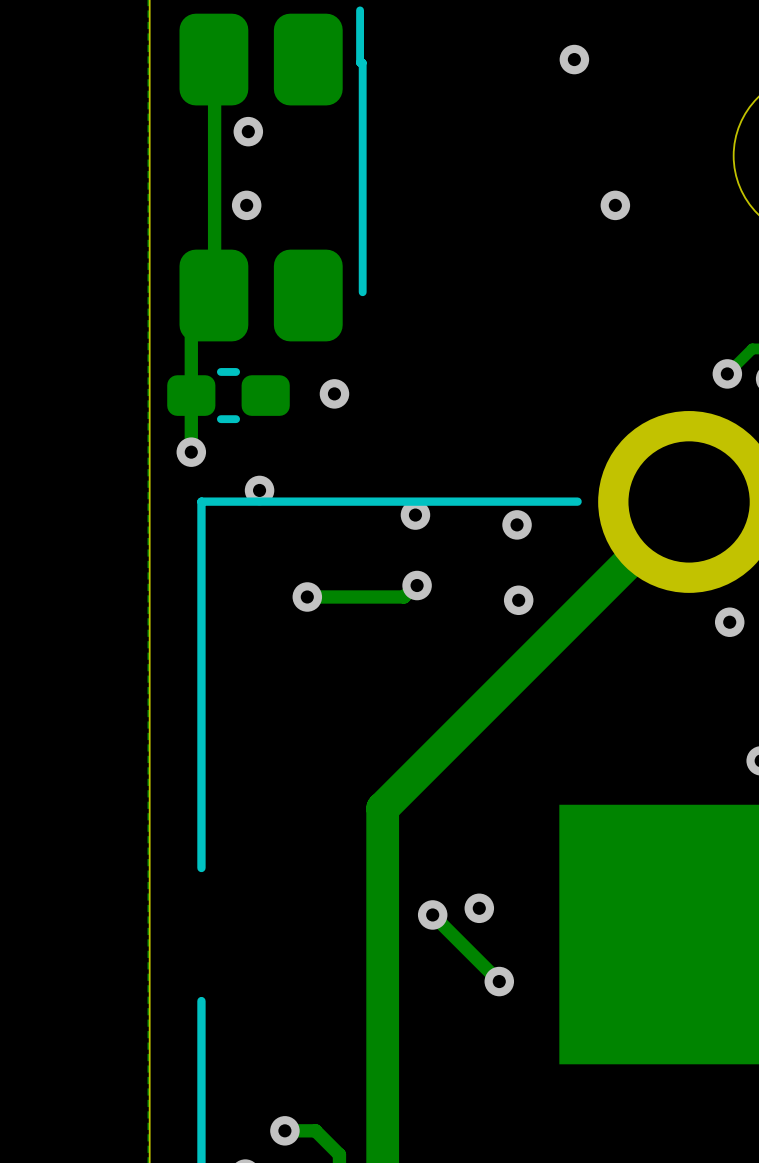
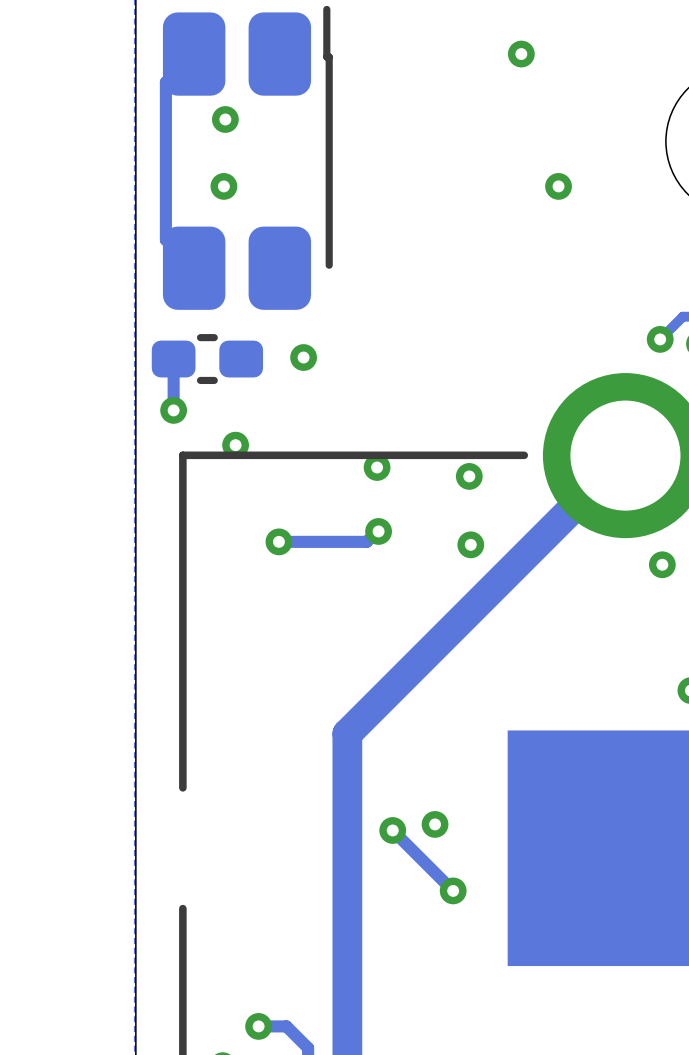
track: (214, 60) (214, 294) (191, 318) (191, 395) -> (194, 54) (165, 82) (165, 239) (194, 268)

